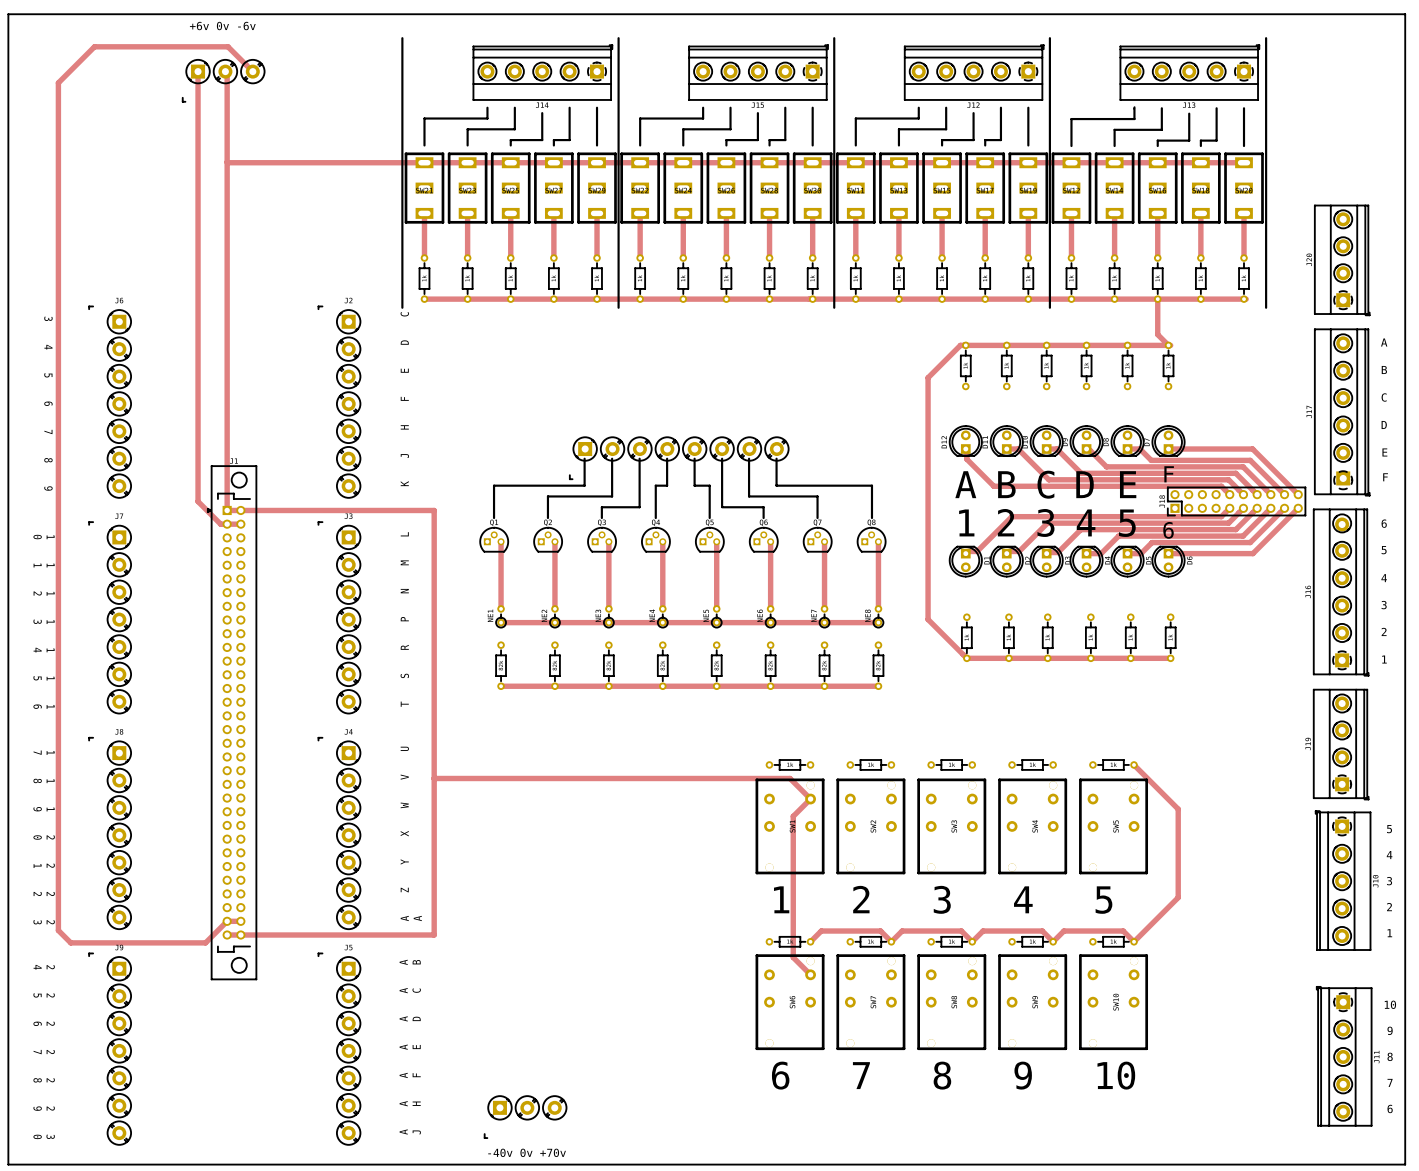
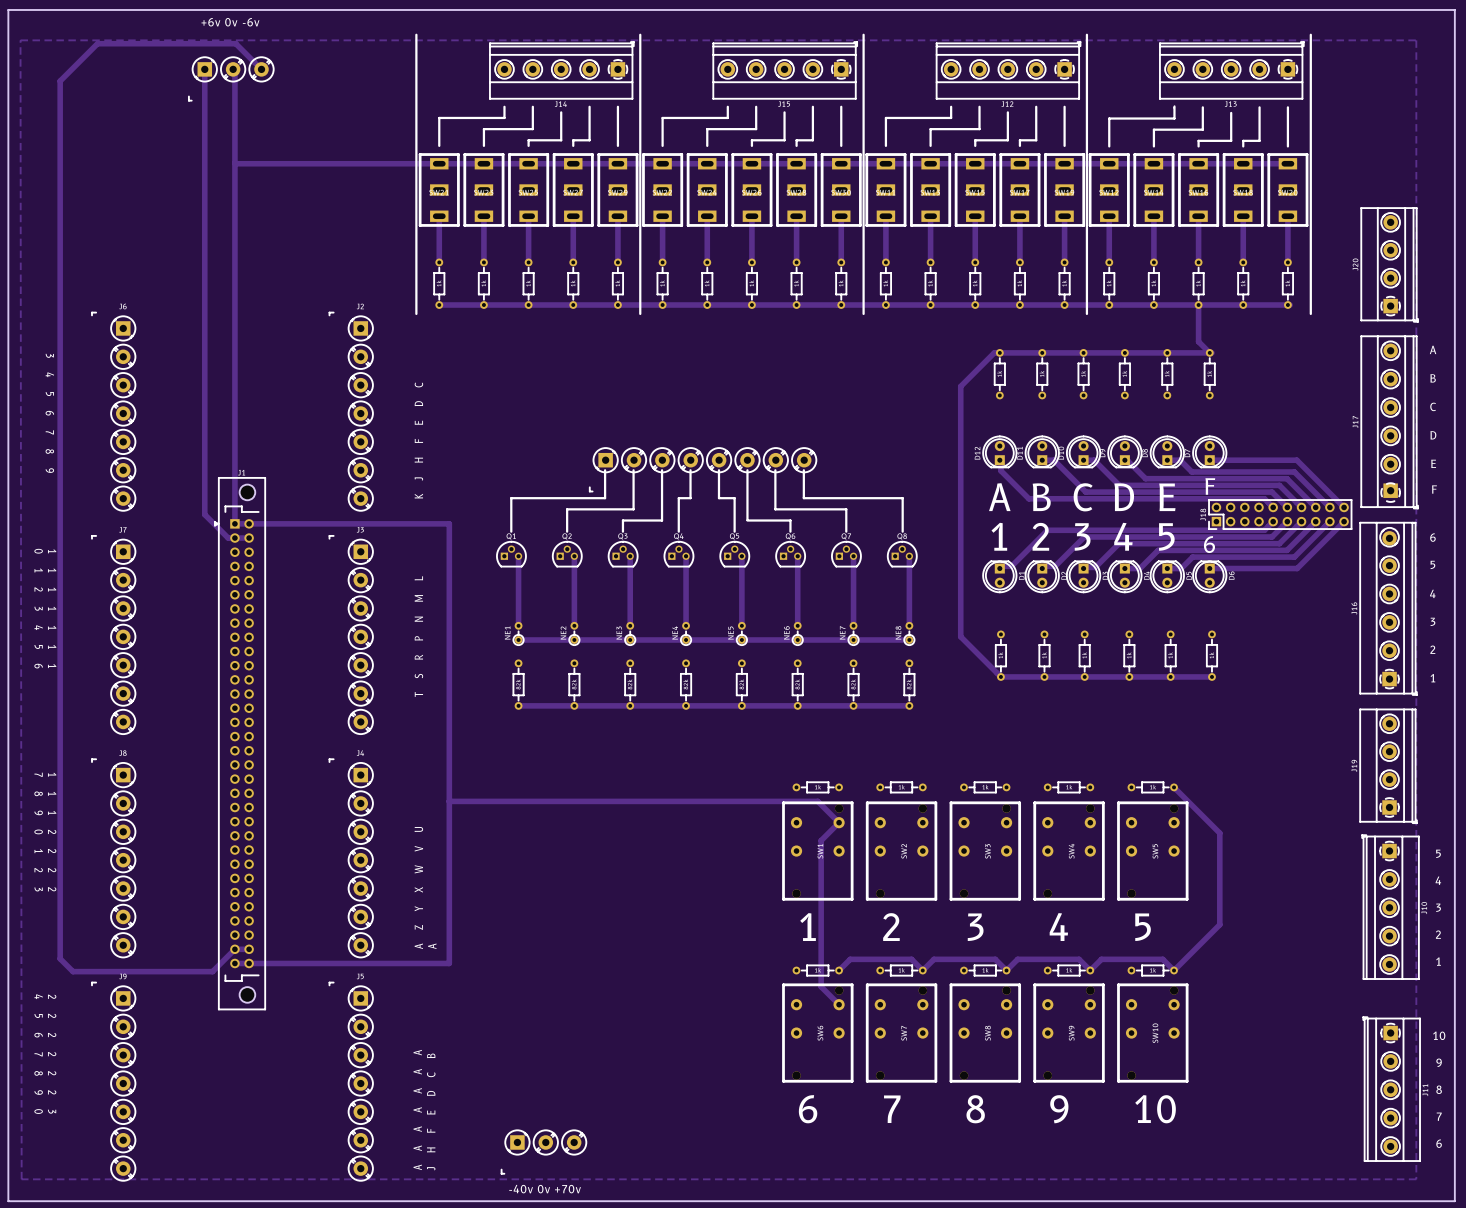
zone outline: none -> (20, 40) (1416, 40) (1416, 1179) (21, 1179) (20, 40)

